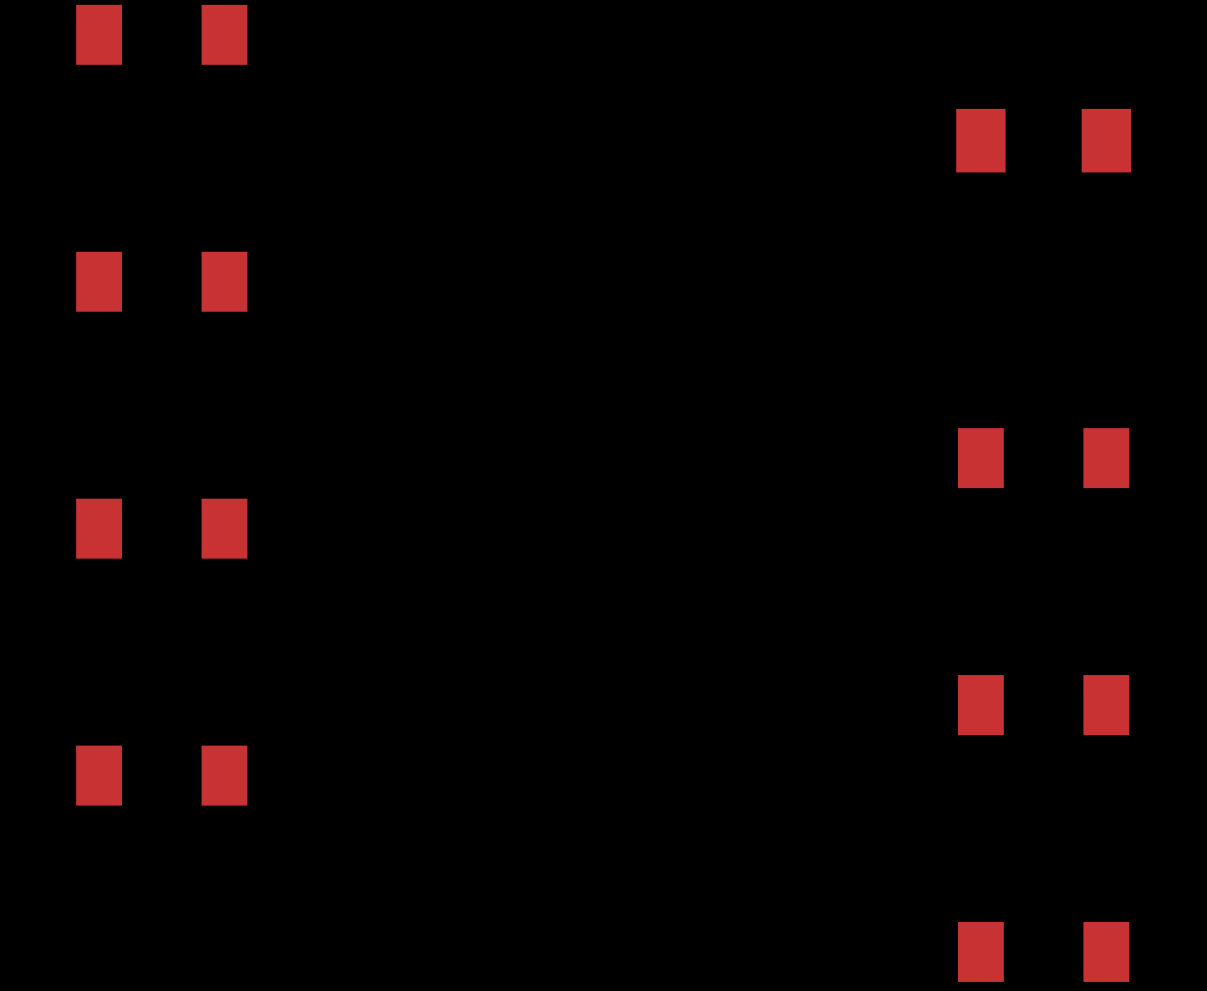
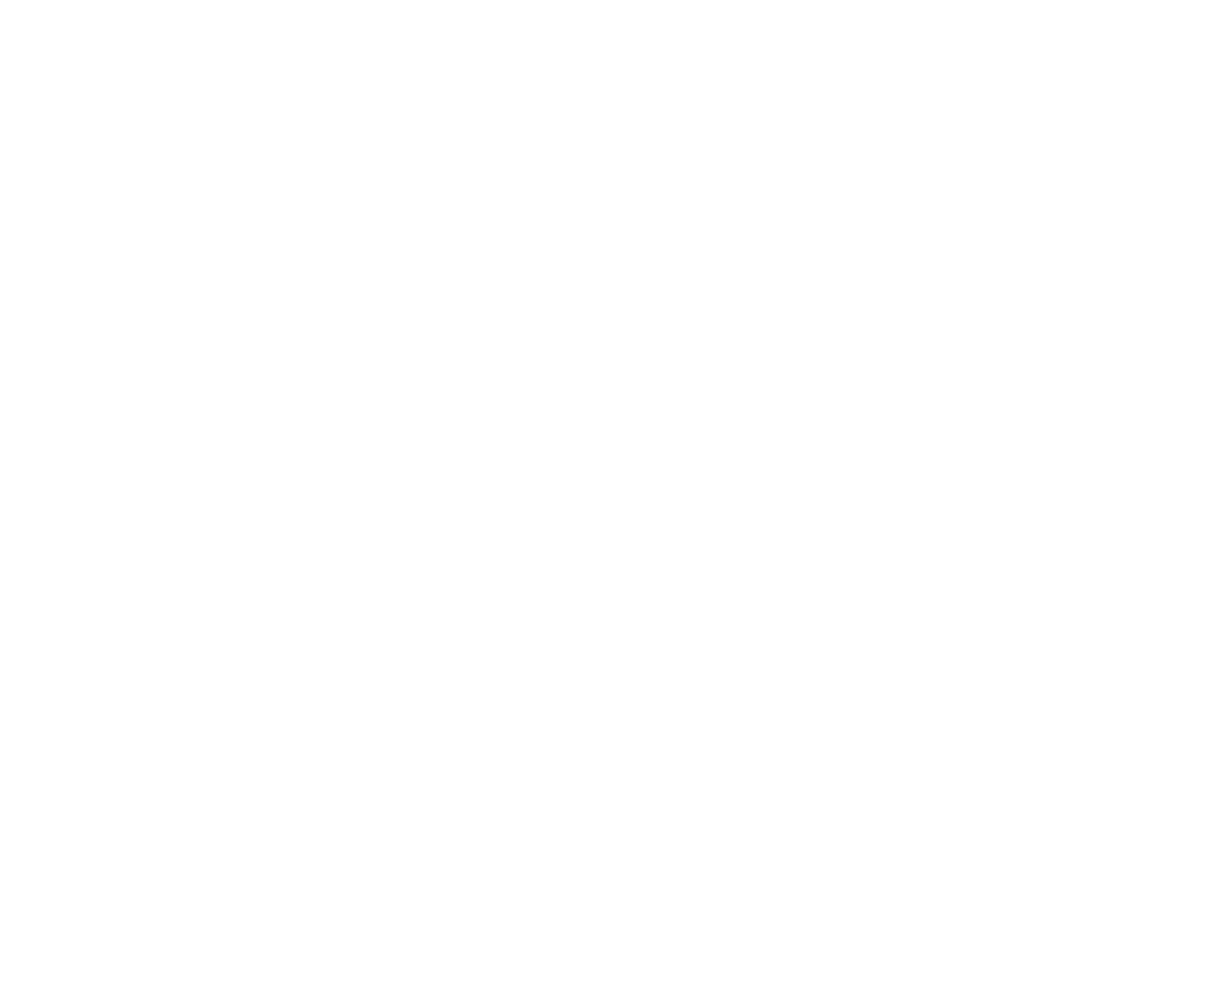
part: (161, 34) -> none
part: (1043, 140) -> none
part: (161, 281) -> none
part: (1043, 458) -> none
part: (161, 528) -> none
part: (1043, 705) -> none
part: (161, 775) -> none
part: (1043, 951) -> none

